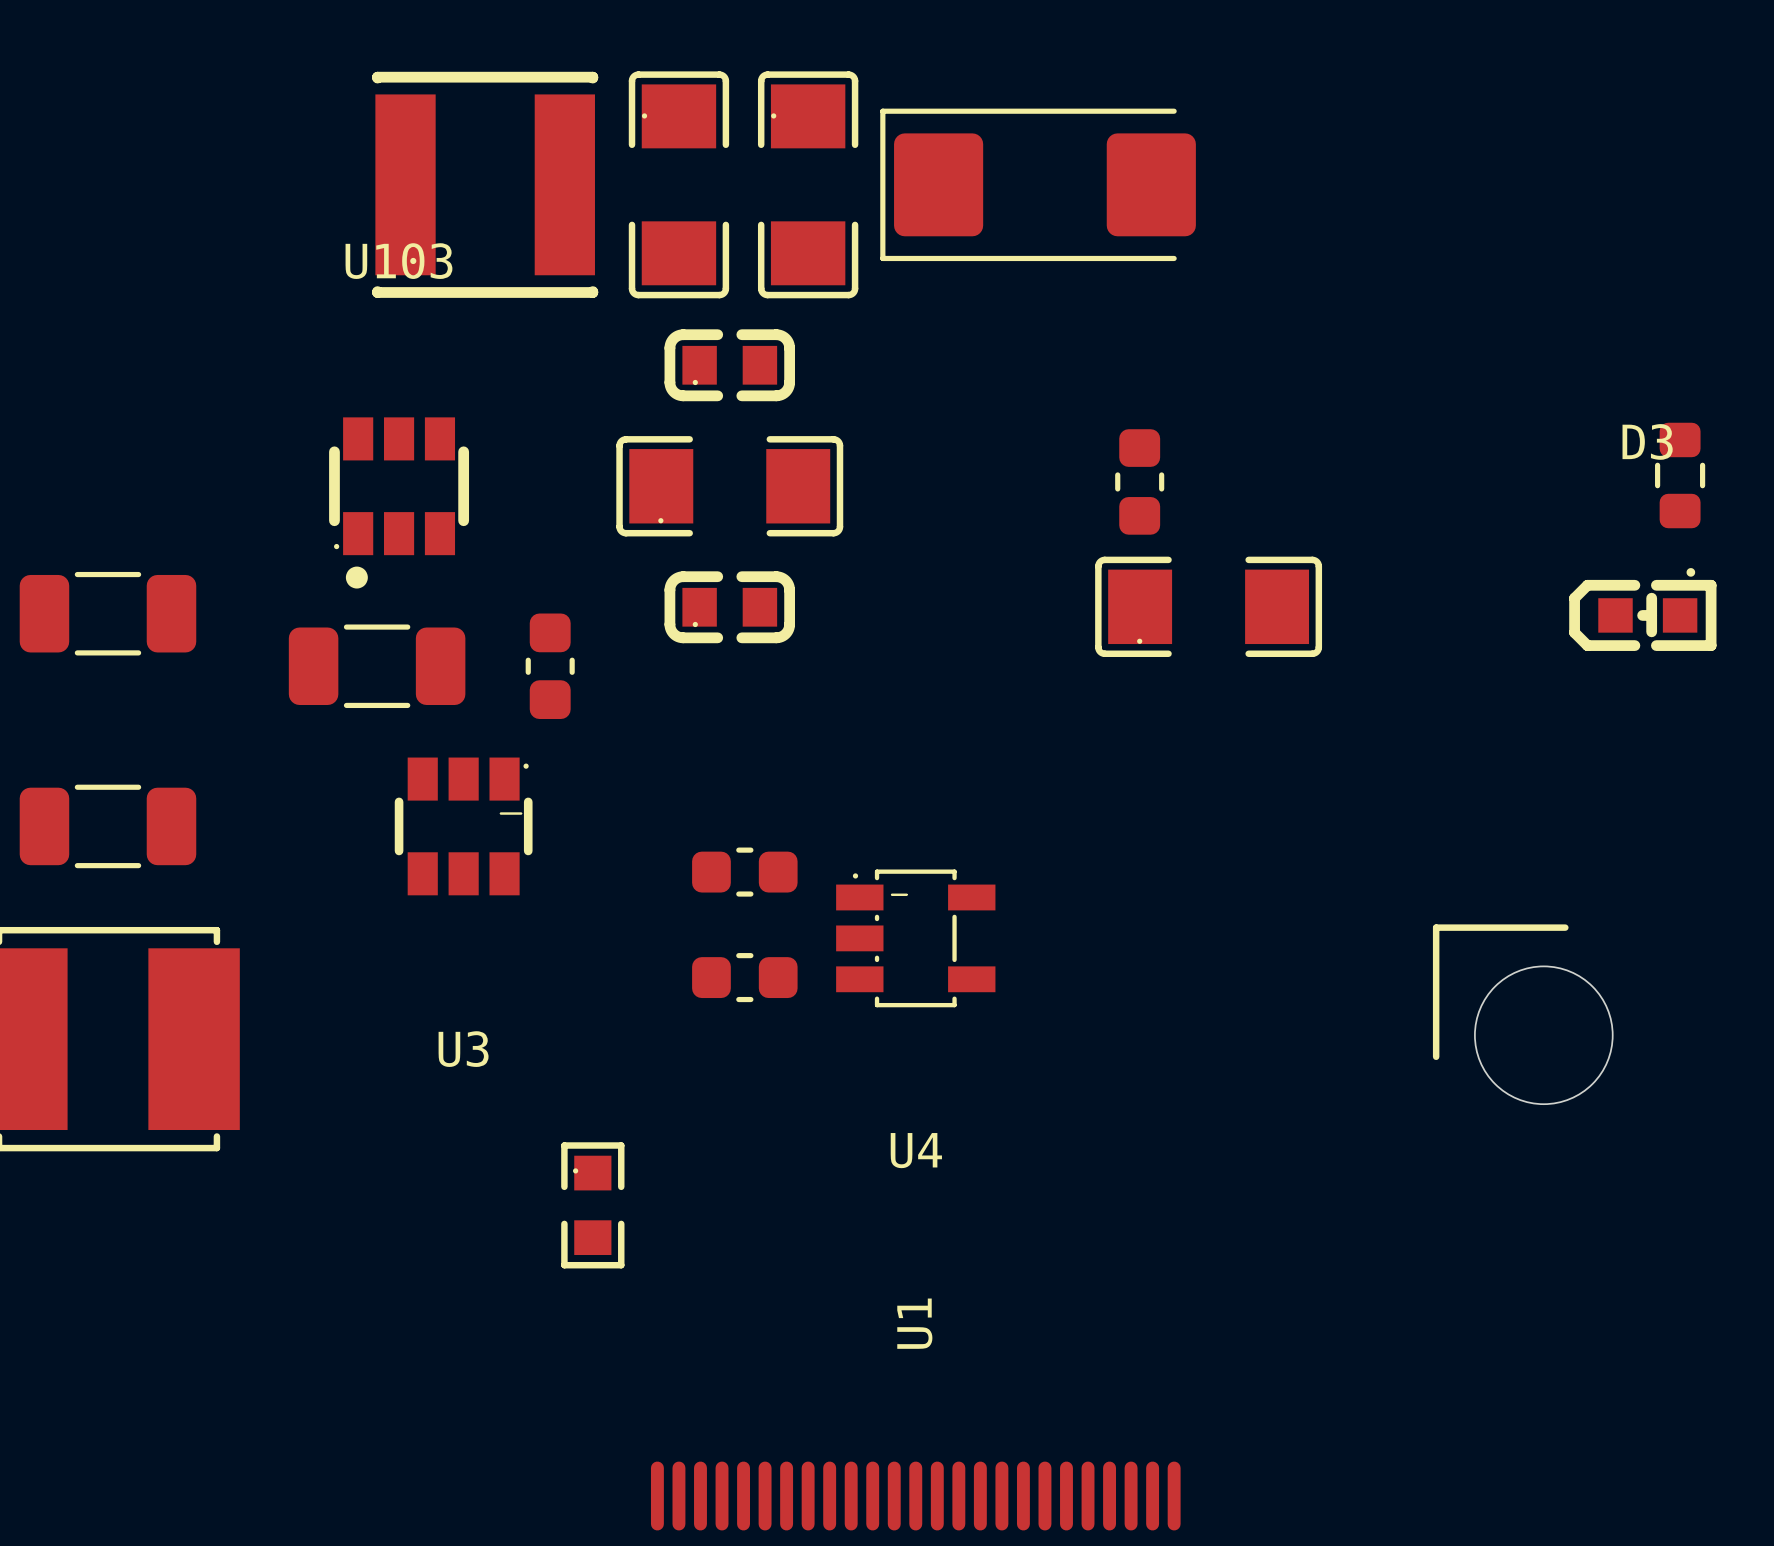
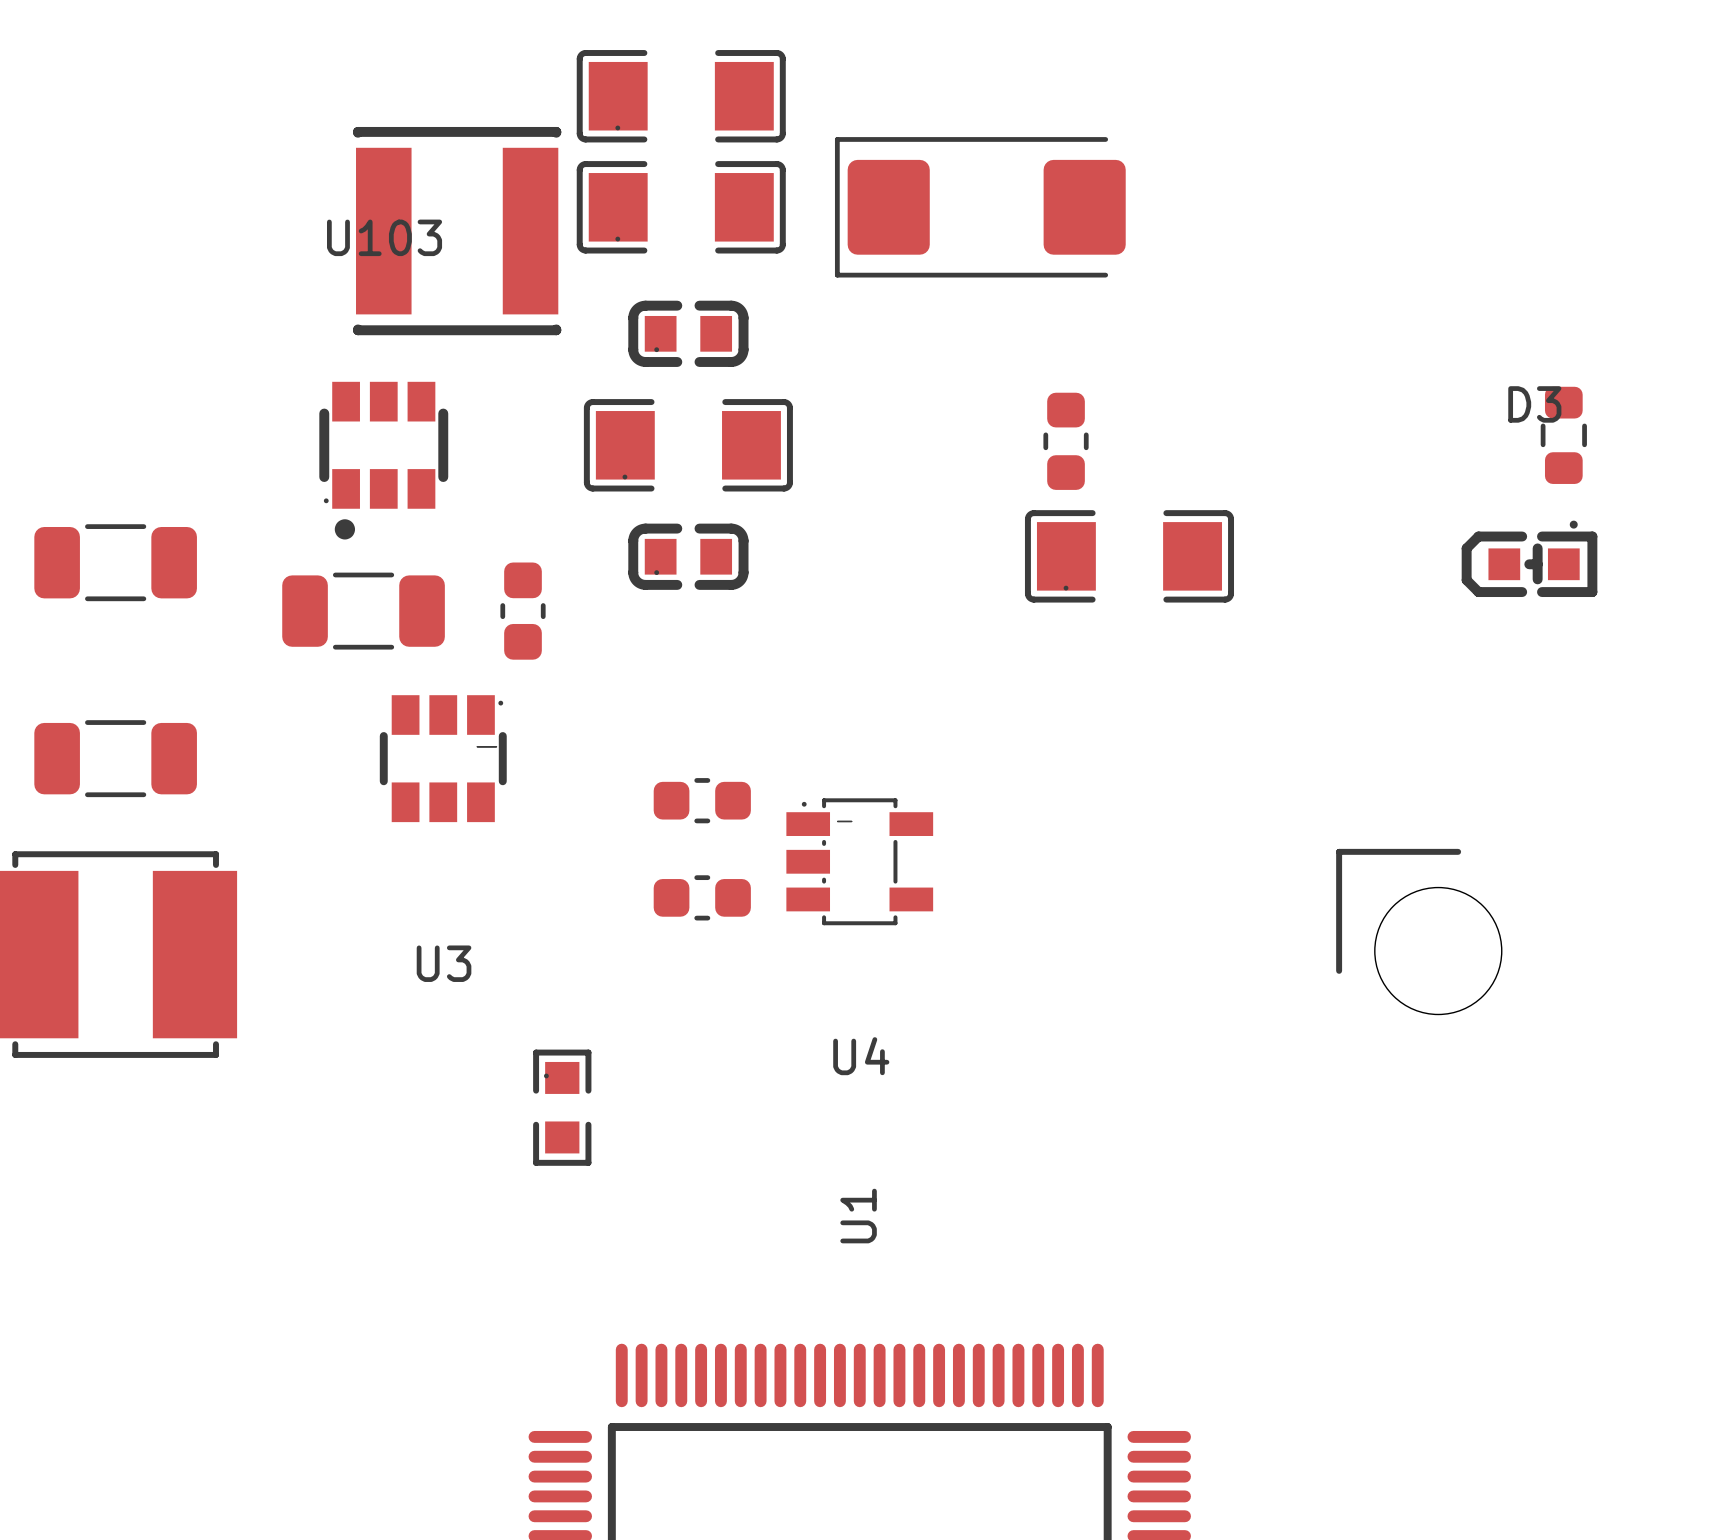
part: none -> (681, 96)
part position: (485, 184) -> (457, 231)
part: (678, 184) -> none
part: (808, 184) -> none
part position: (1038, 184) -> (980, 207)
part: none -> (681, 207)

